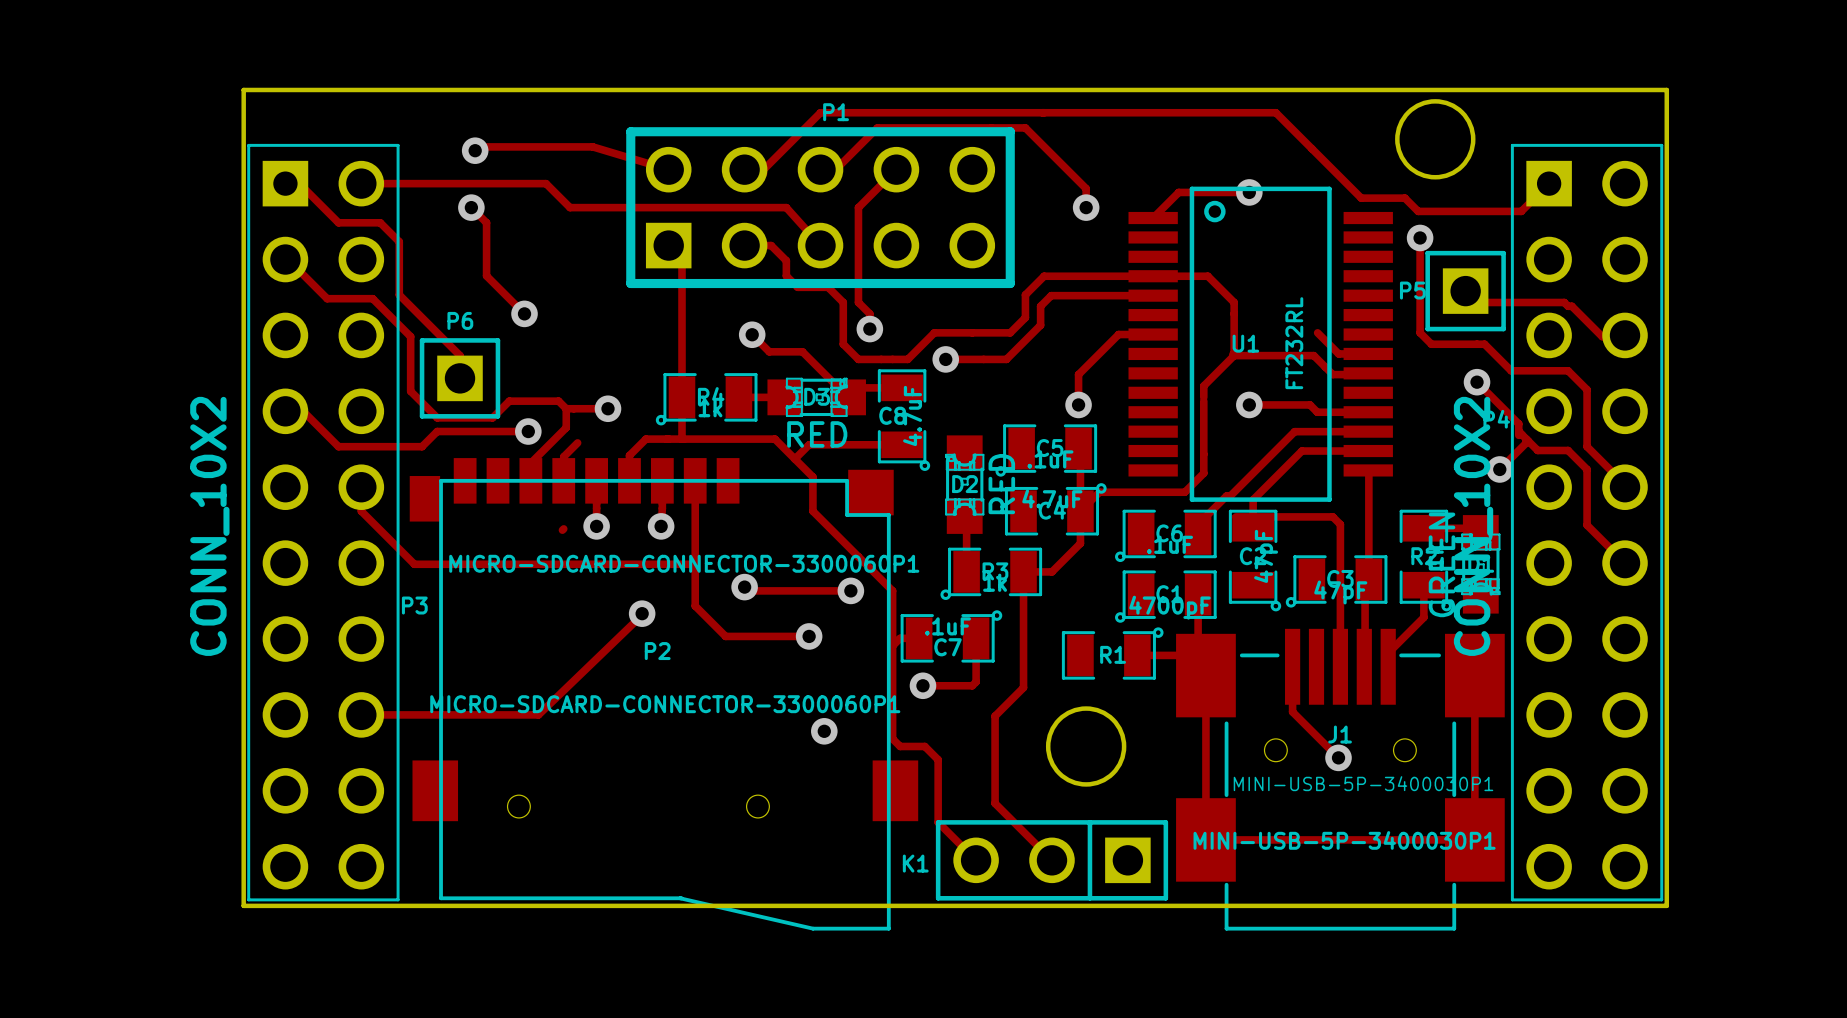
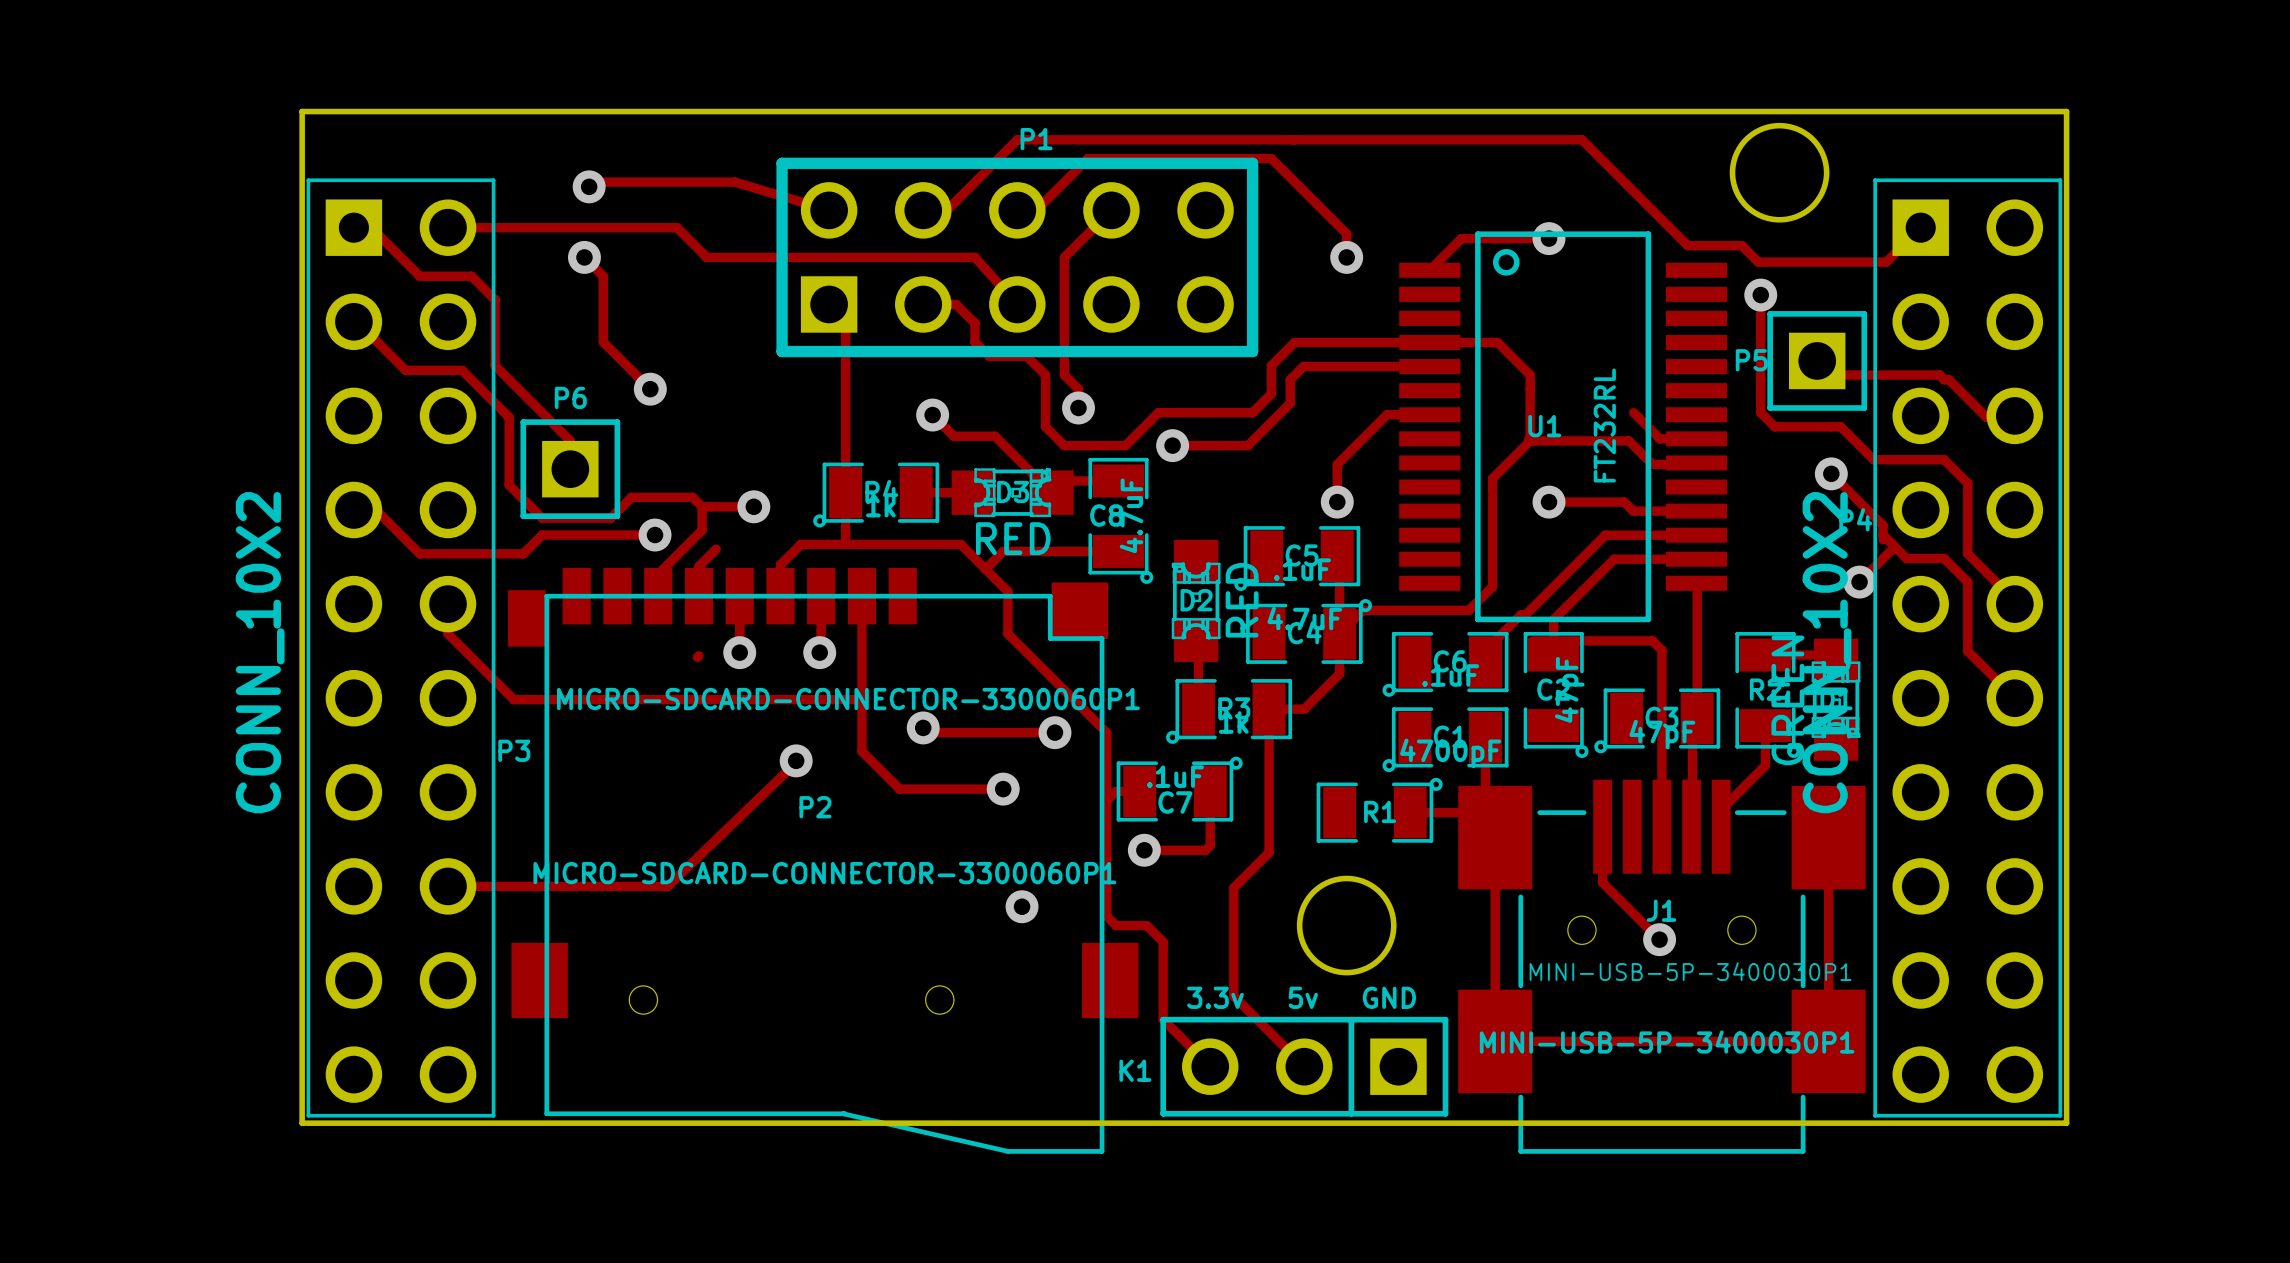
text: none -> 3.3v 5v GND (1301, 997)

